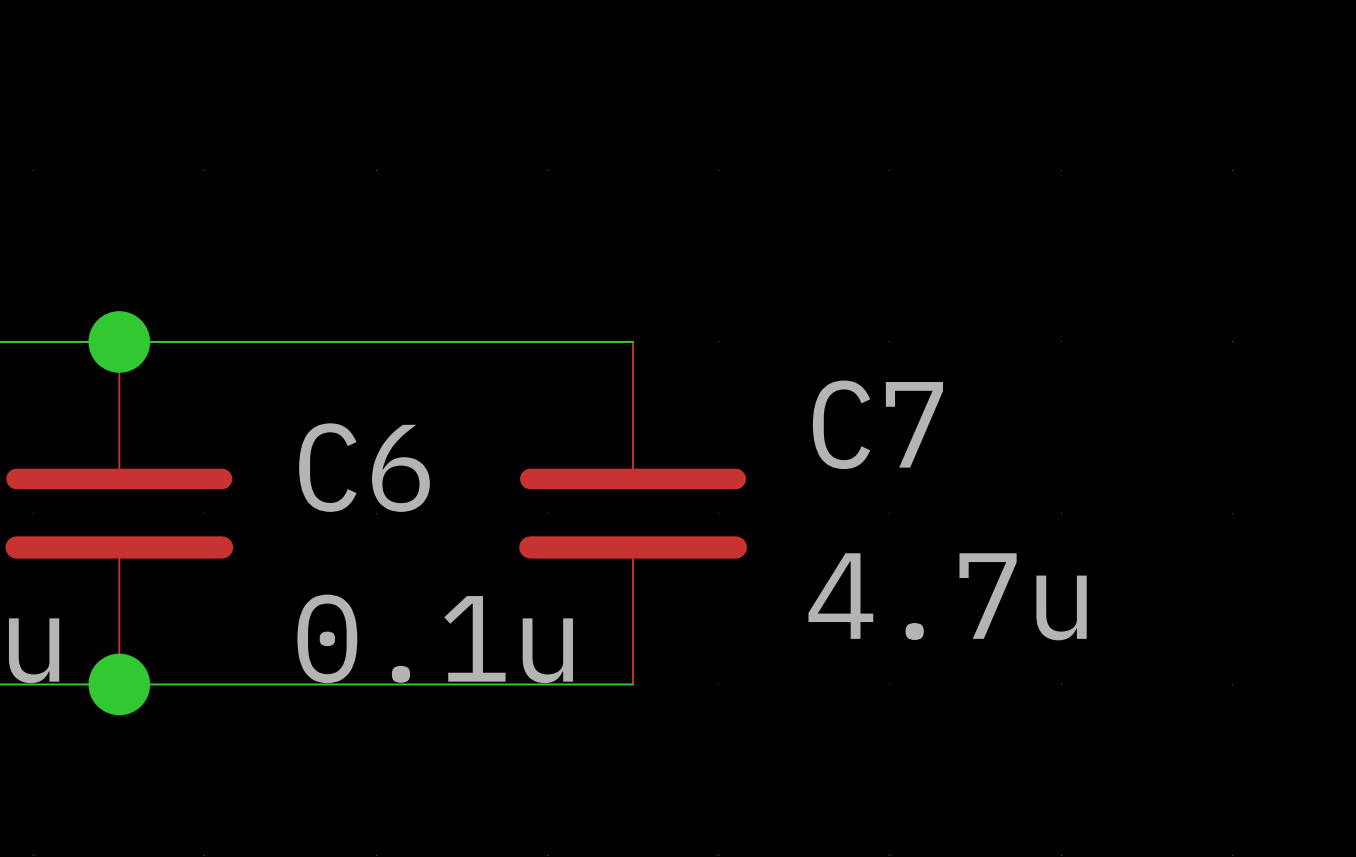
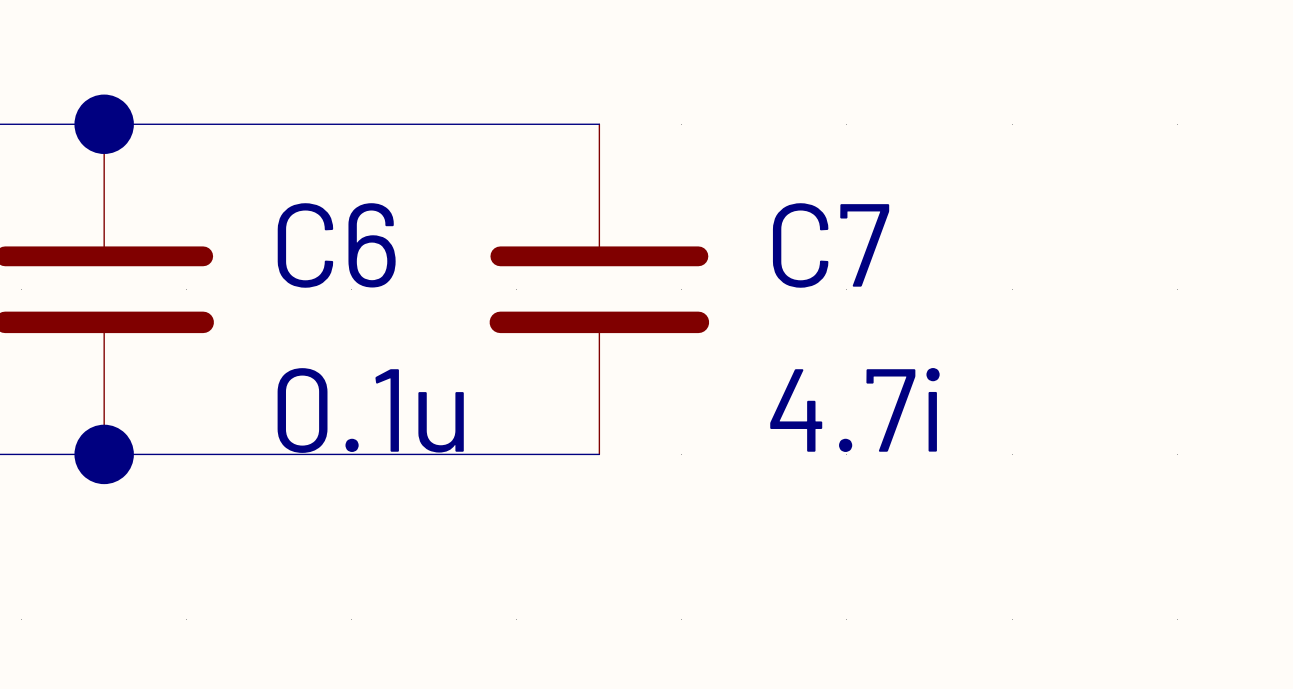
C7 name position: C7 (877, 424) -> C7 (831, 245)
C7 value: 4.7u (947, 596) -> 4.7i (854, 410)

